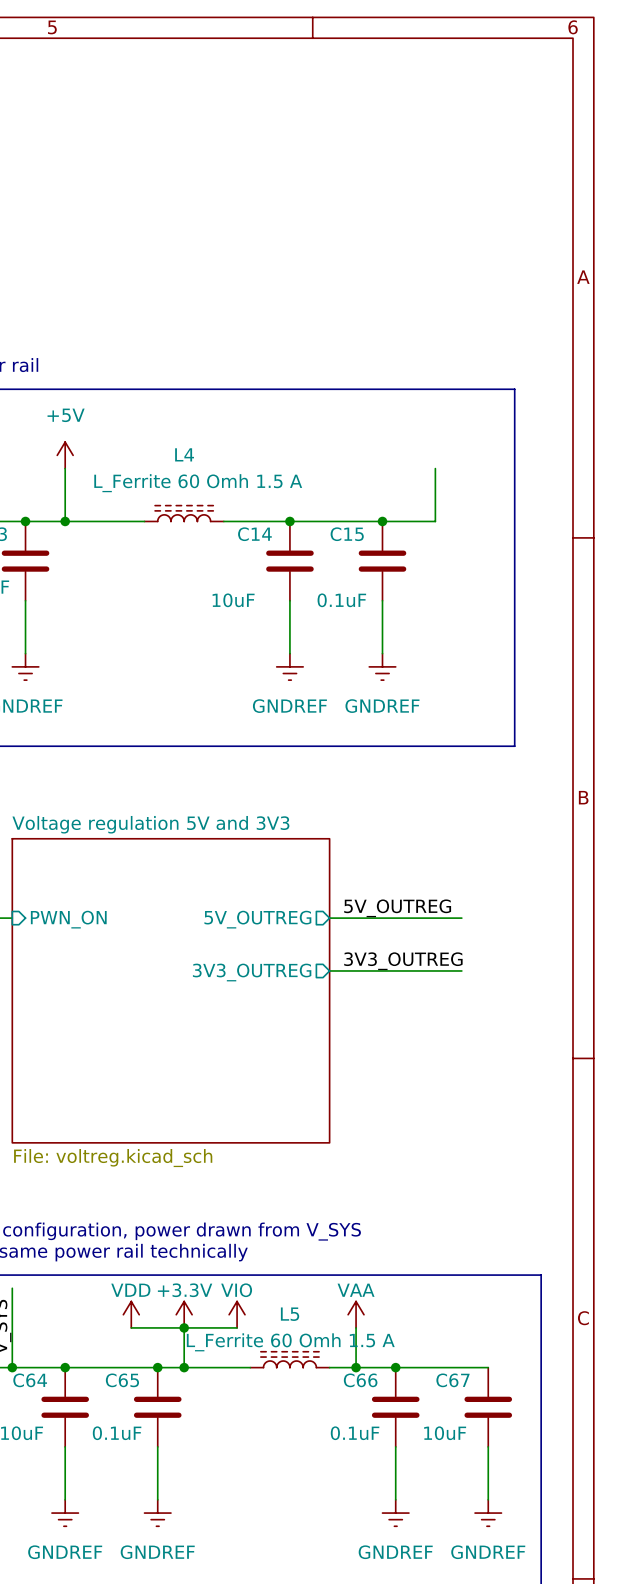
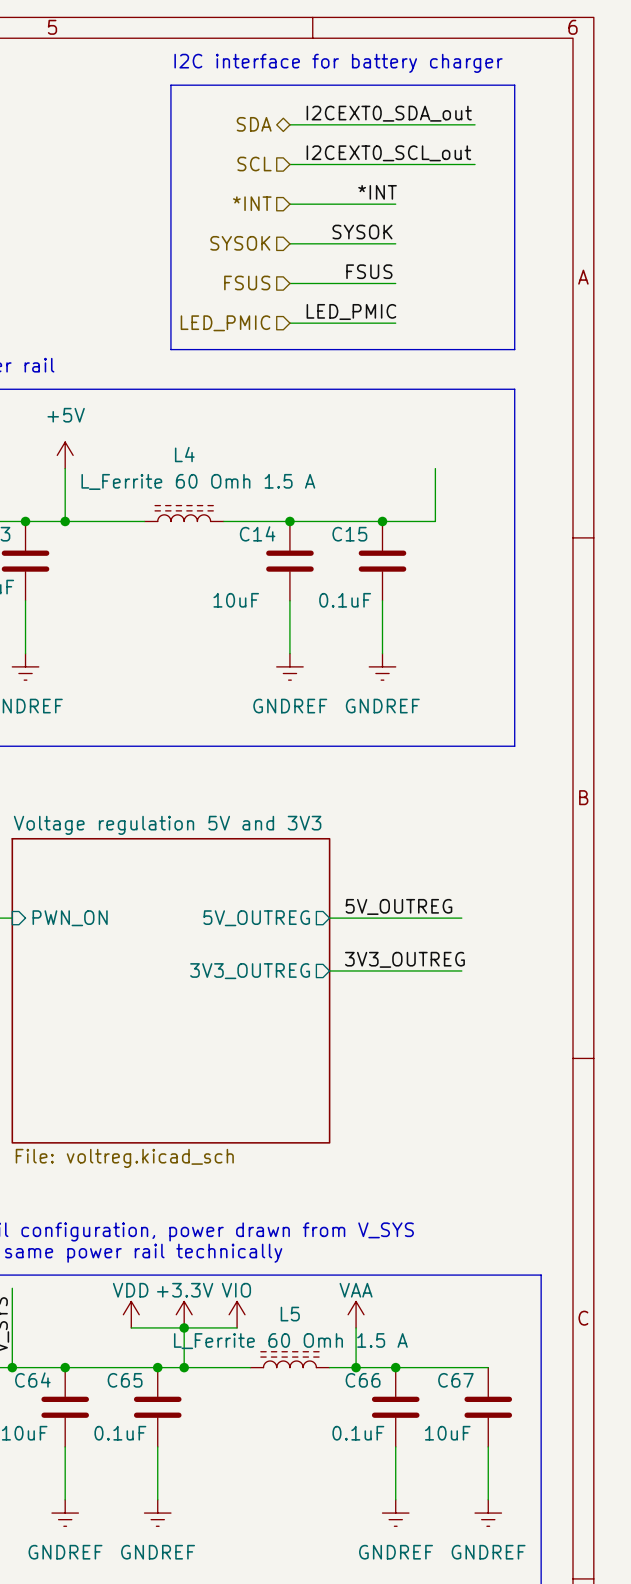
text: none -> I2C interface for battery charger (338, 63)
line: none -> (170, 85) (170, 349) (514, 349) (514, 85) (170, 85)
label: none -> I2CEXT0_SDA_out (389, 113)
hierarchical label: none -> SDA (254, 124)
wire: none -> (289, 124) (475, 124)
label: none -> I2CEXT0_SCL_out (388, 153)
hierarchical label: none -> SCL (254, 164)
wire: none -> (289, 164) (475, 164)
label: none -> *INT (377, 192)
hierarchical label: none -> *INT (252, 203)
wire: none -> (289, 204) (395, 204)
label: none -> SYSOK (362, 232)
hierarchical label: none -> SYSOK (240, 243)
wire: none -> (289, 243) (395, 243)
label: none -> FSUS (369, 271)
hierarchical label: none -> FSUS (247, 283)
wire: none -> (289, 283) (395, 283)
label: none -> LED_PMIC (351, 311)
wire: none -> (289, 323) (395, 323)
hierarchical label: none -> LED_PMIC (225, 323)

